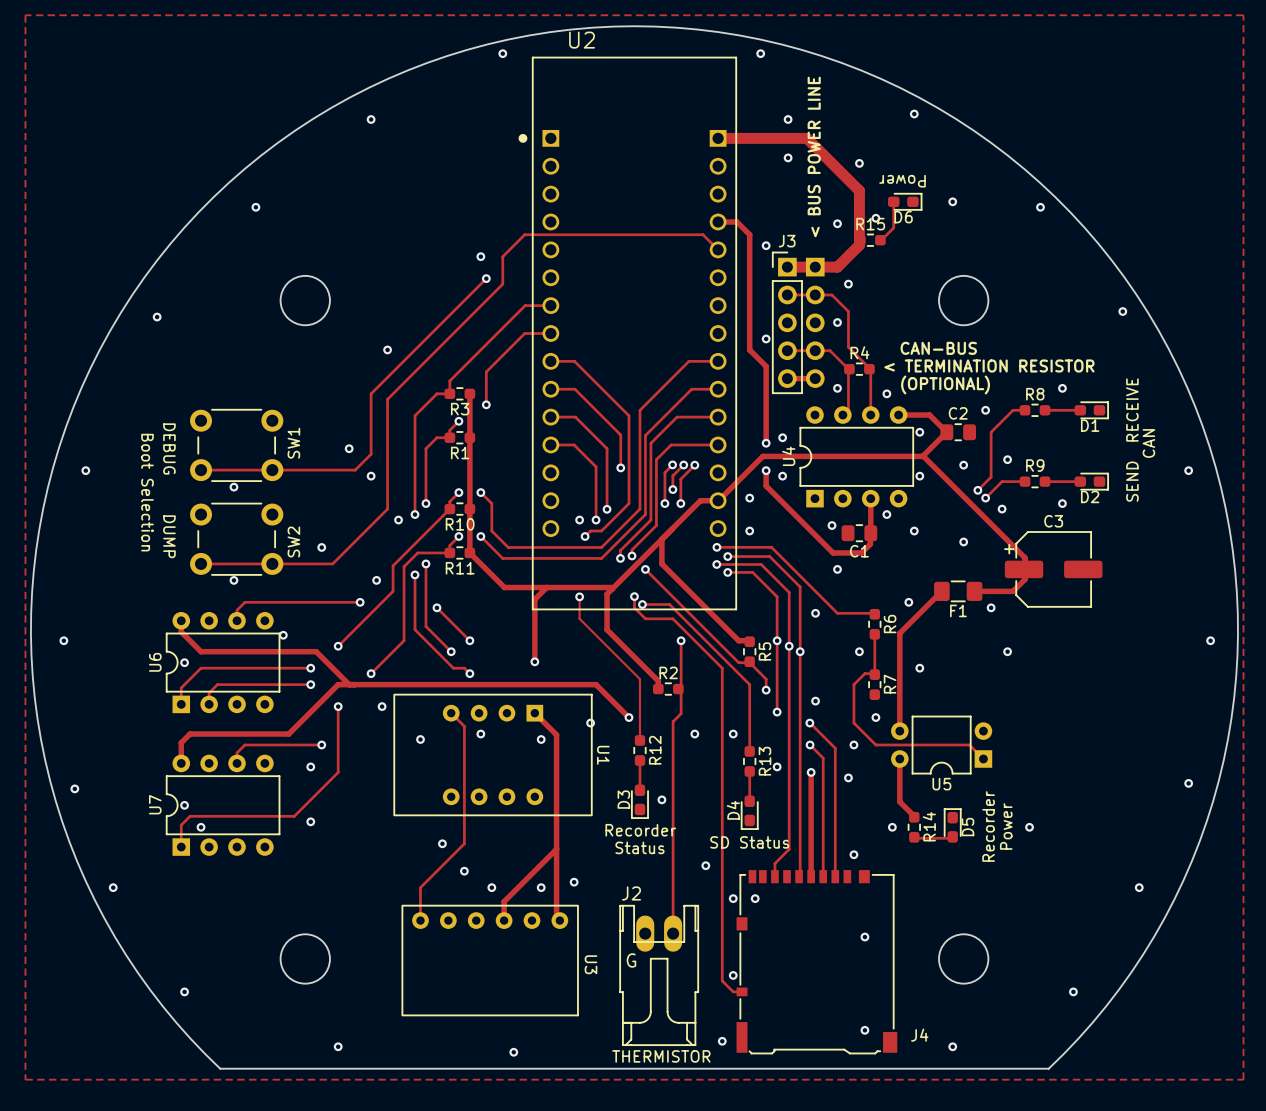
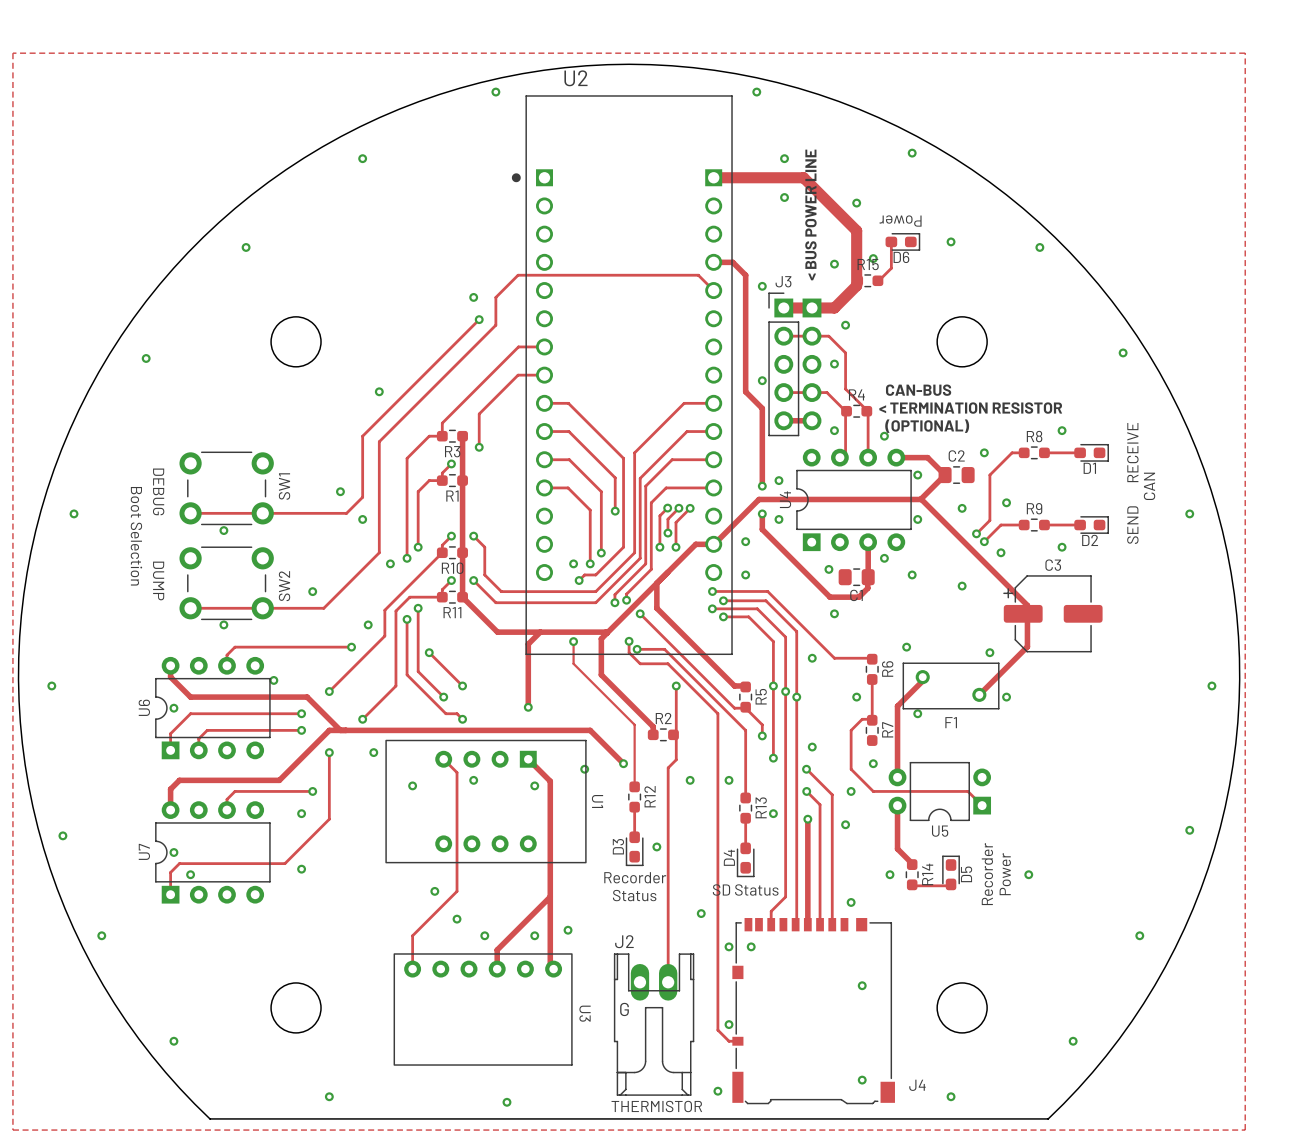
track: (1025, 558) (1025, 579) (1013, 591) (974, 591) -> (1024, 602) (1027, 605) (1027, 646) (980, 693)
F1 footprint: [934, 580, 983, 603] -> [902, 662, 1000, 710]
track: (941, 591) (899, 633) (899, 660) -> (923, 679) (897, 706)

